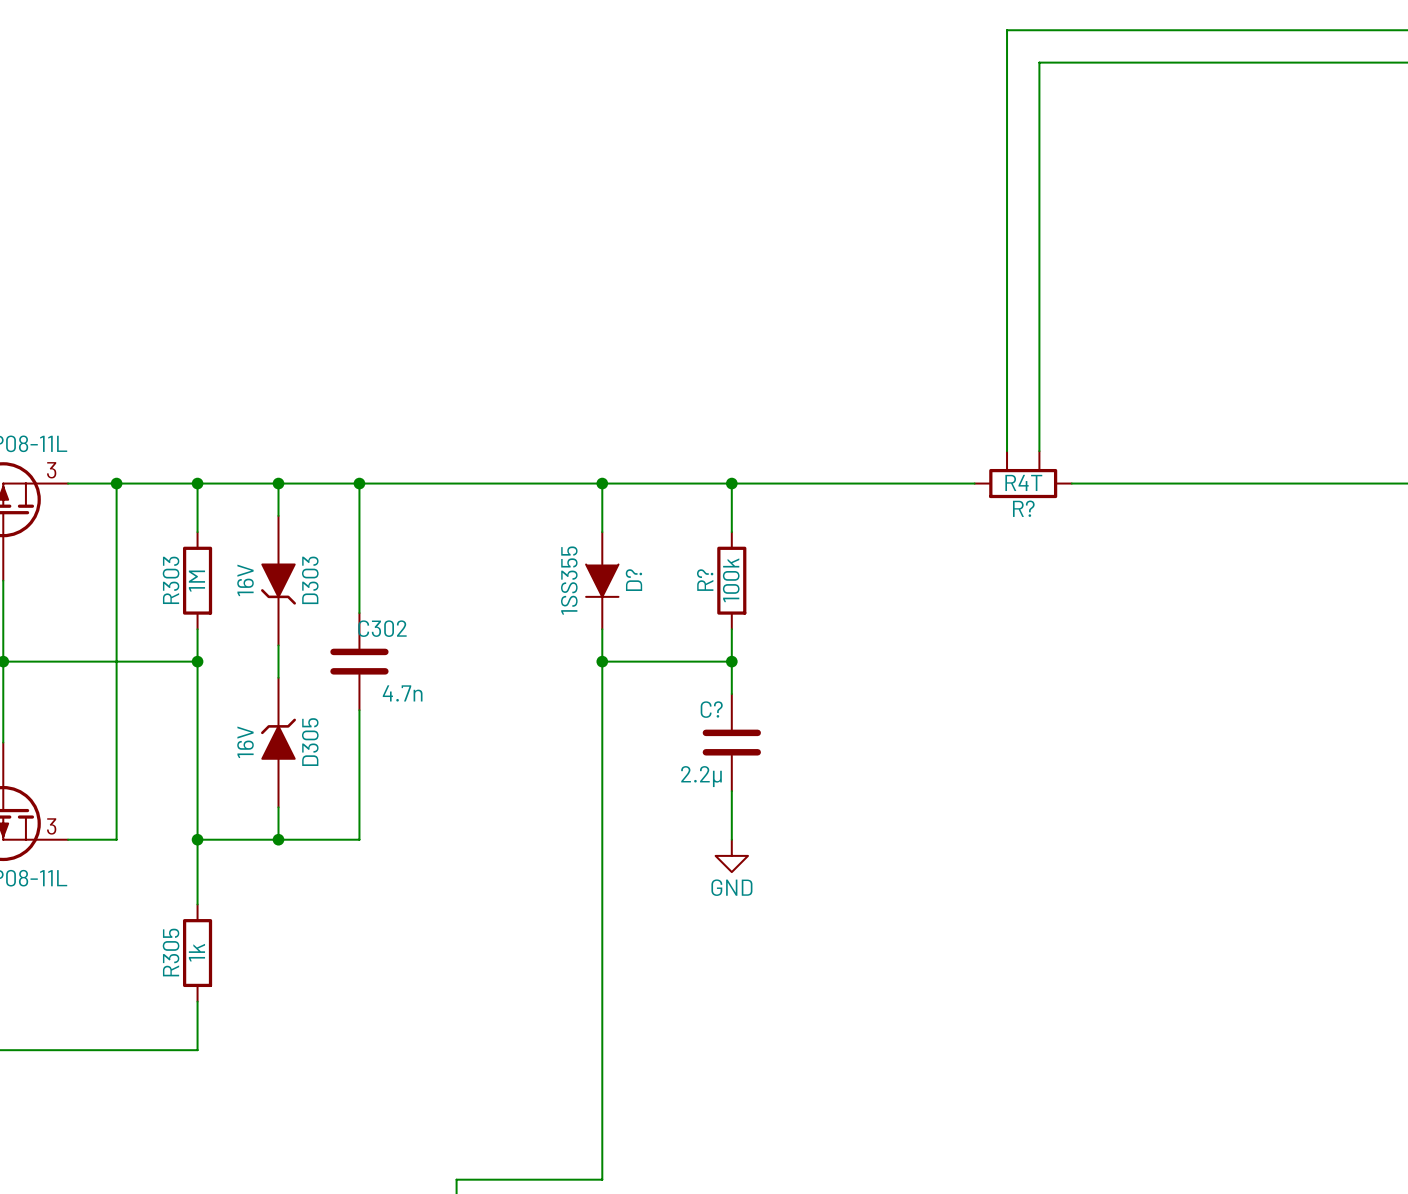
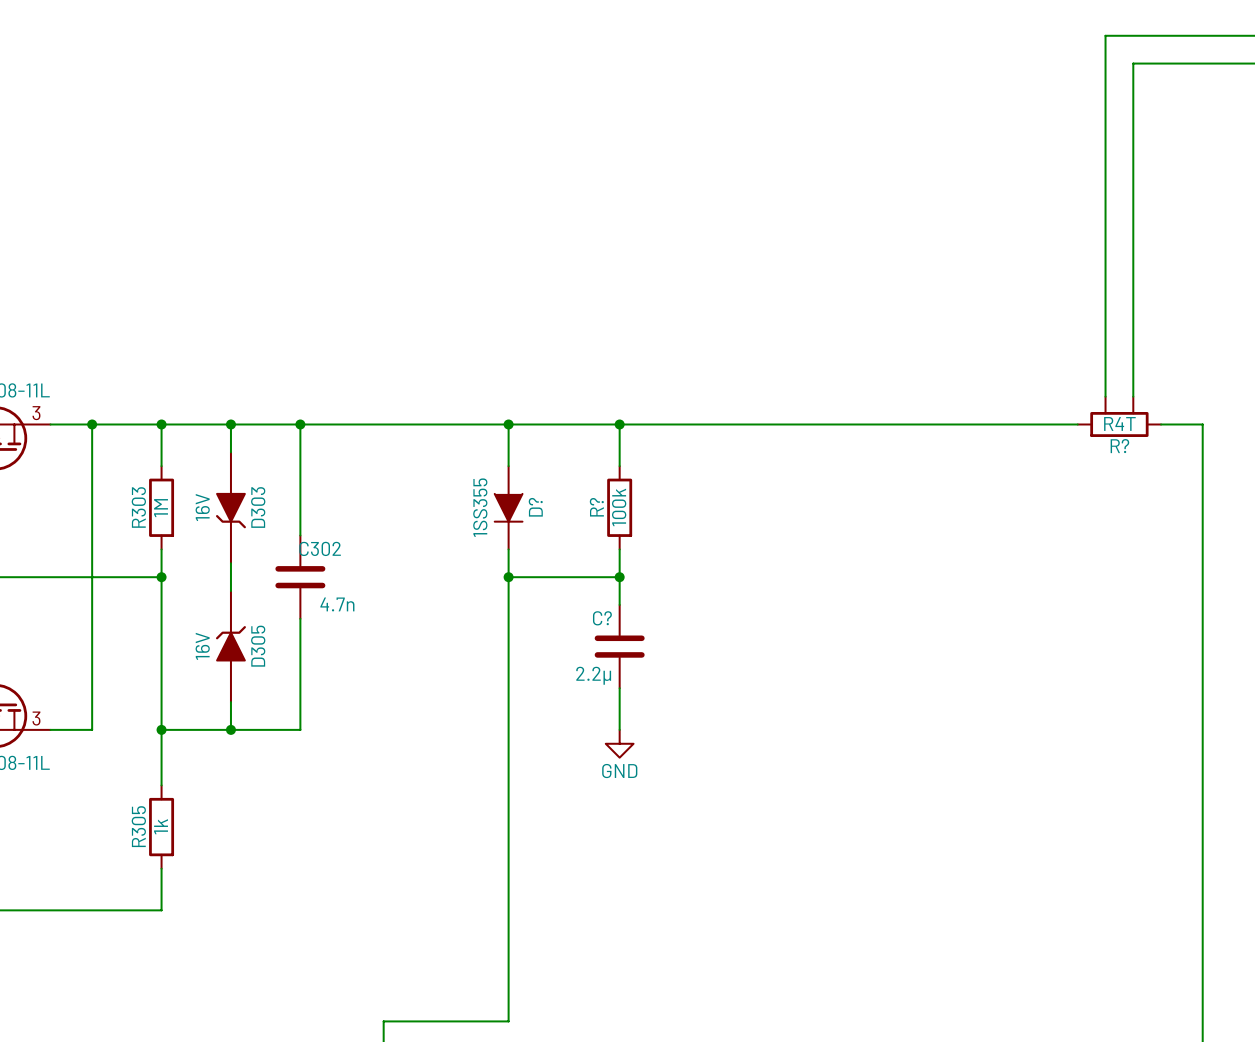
wire: (1298, 30) (1007, 30) (1007, 451) -> (1105, 35) (1105, 396)
wire: (1330, 62) (1039, 62) (1039, 451) -> (1133, 63) (1133, 396)
R? position: (1023, 474) -> (1119, 416)
wire: (1266, 483) (1363, 483) -> (827, 424) (911, 424)

